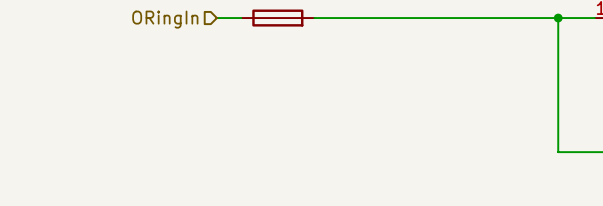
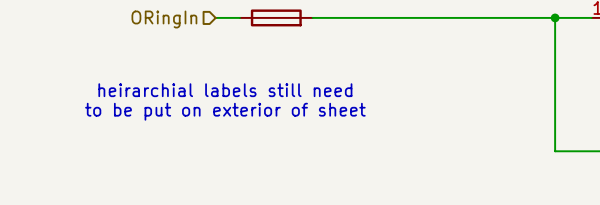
text: none -> heirarchial labels still need (225, 90)
text: none -> to be put on exterior of sheet (225, 111)

